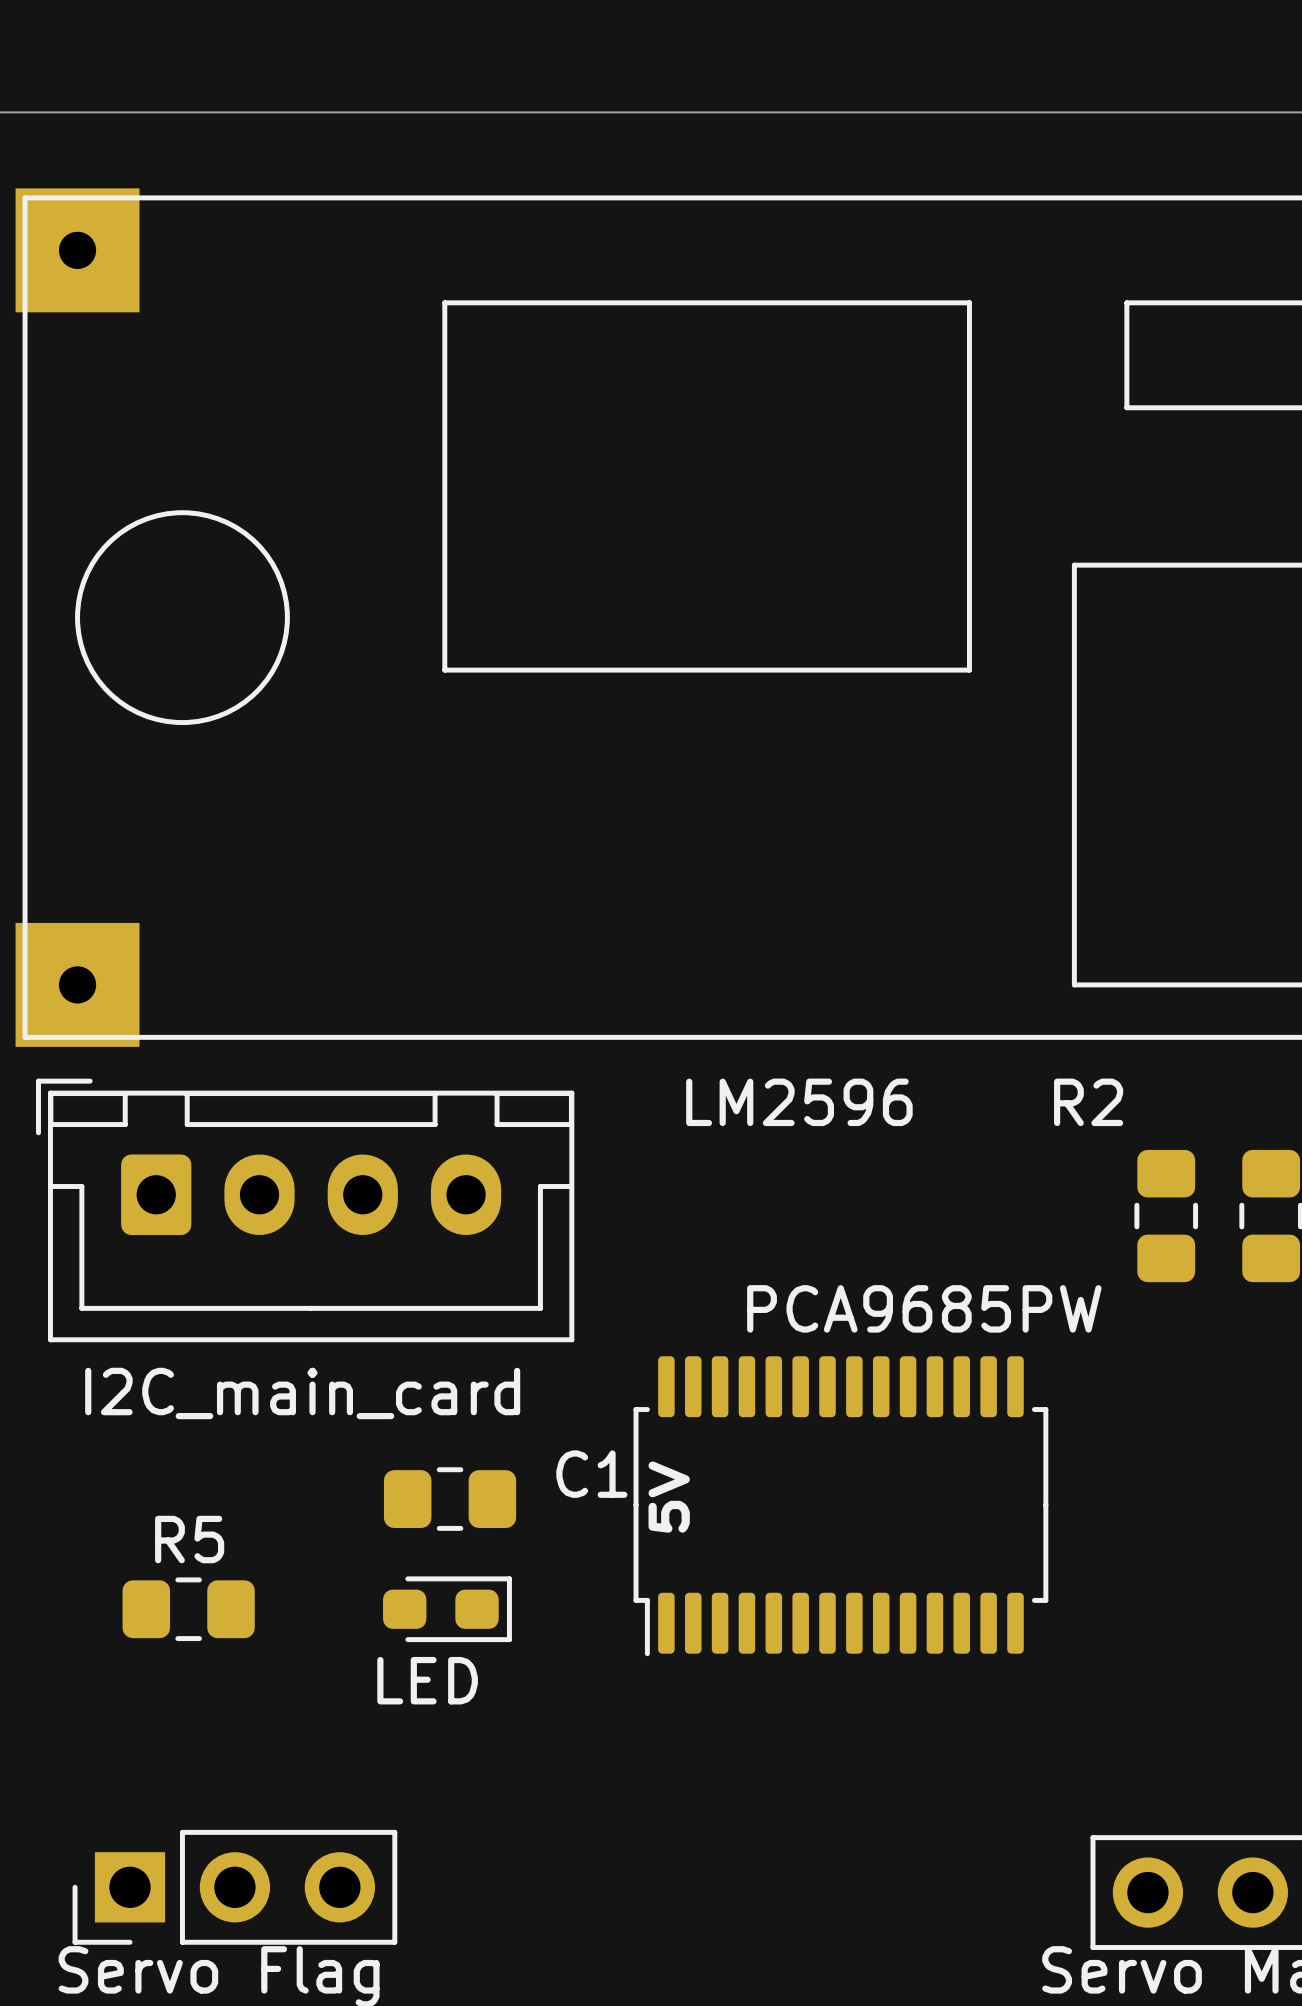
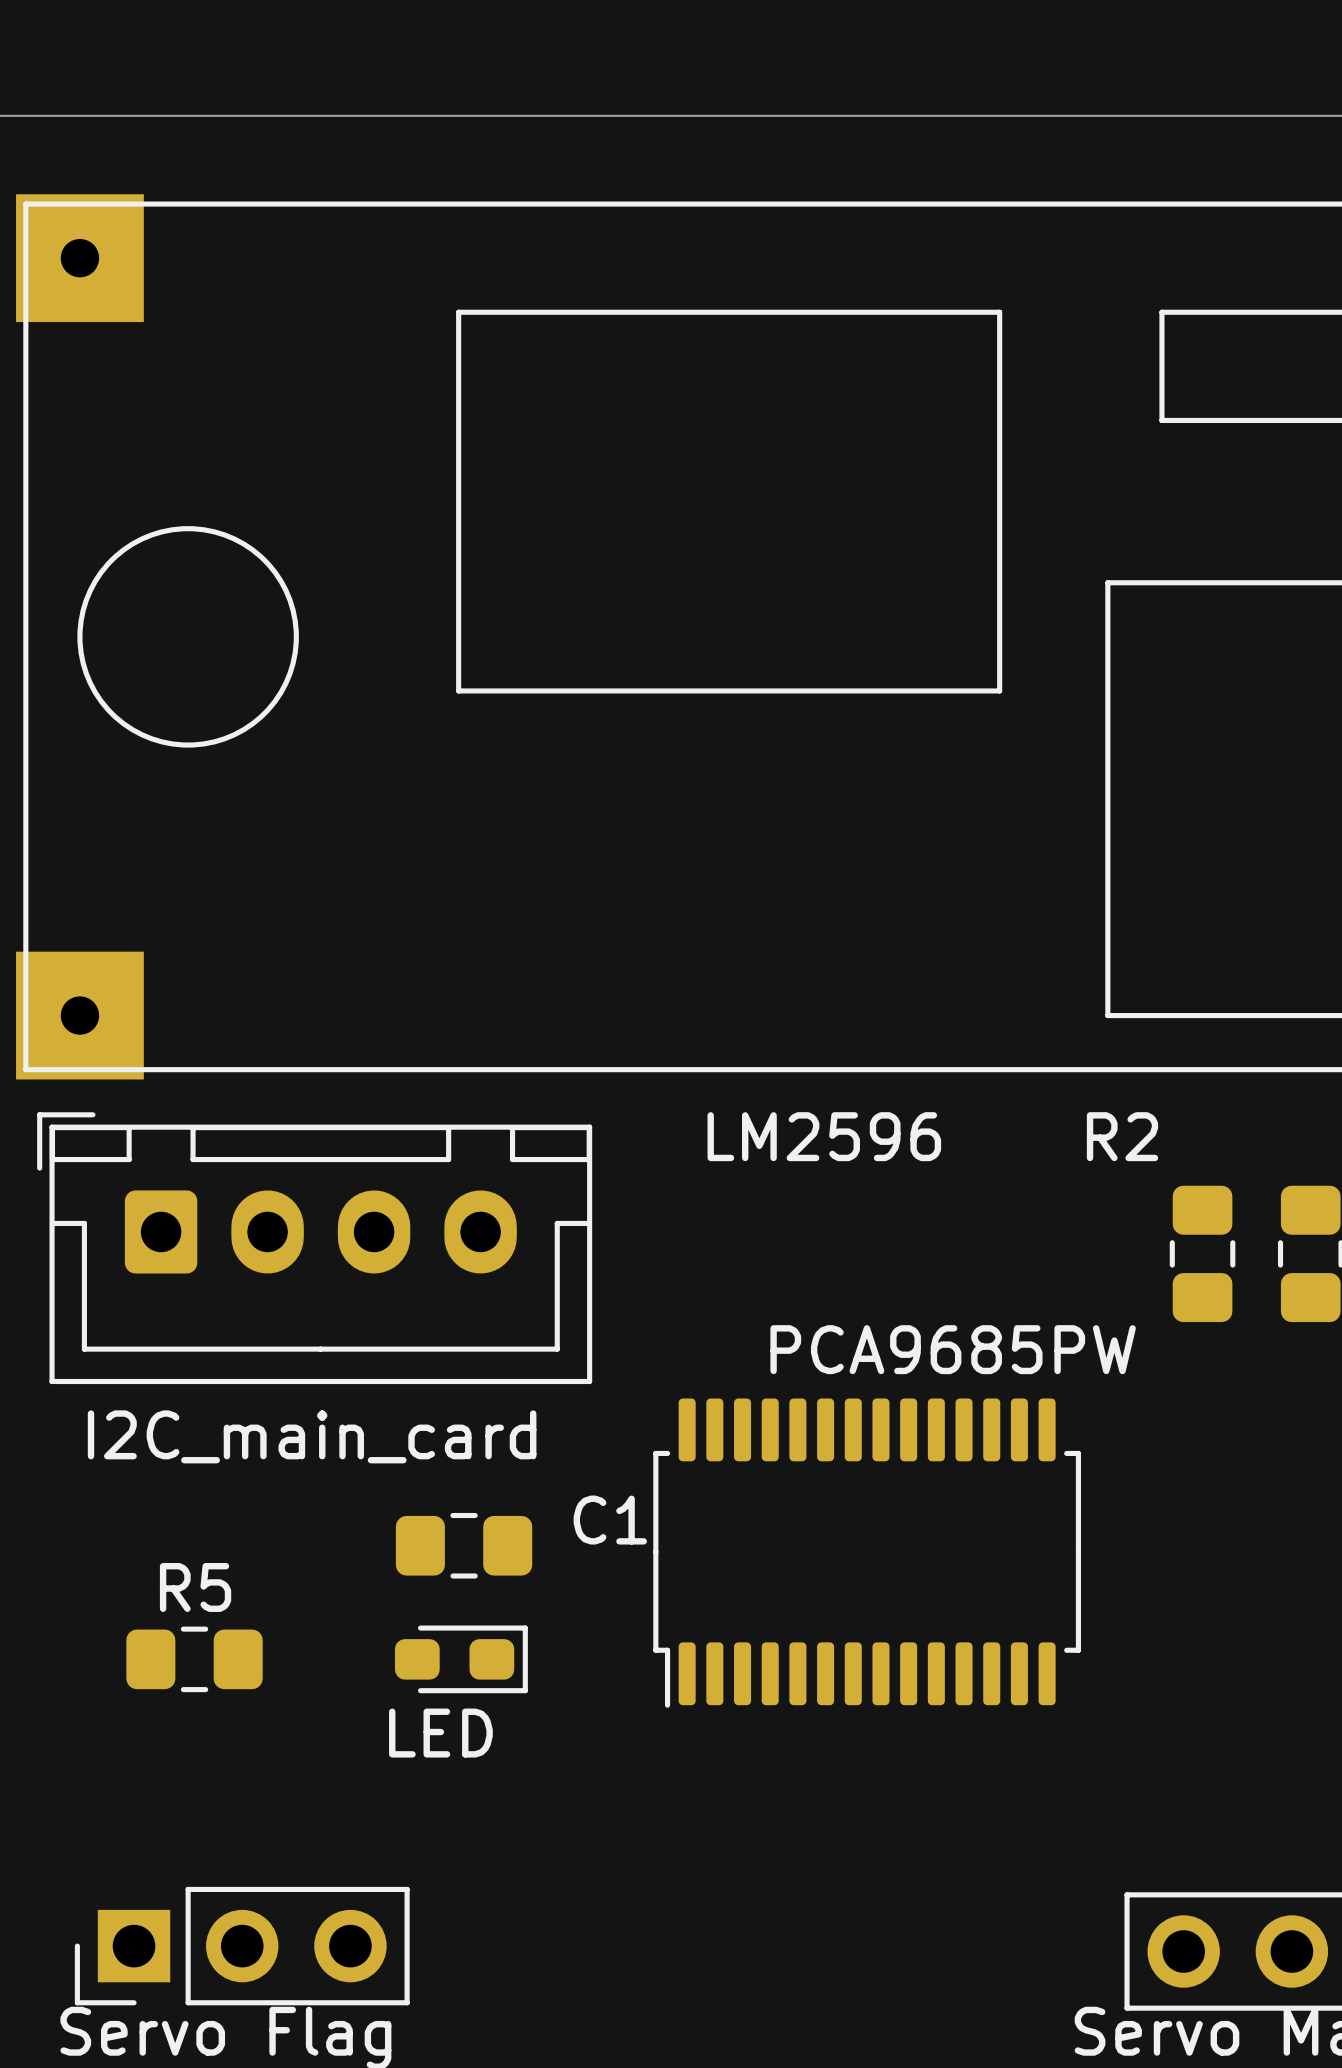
text: 5V (669, 1497) -> none

